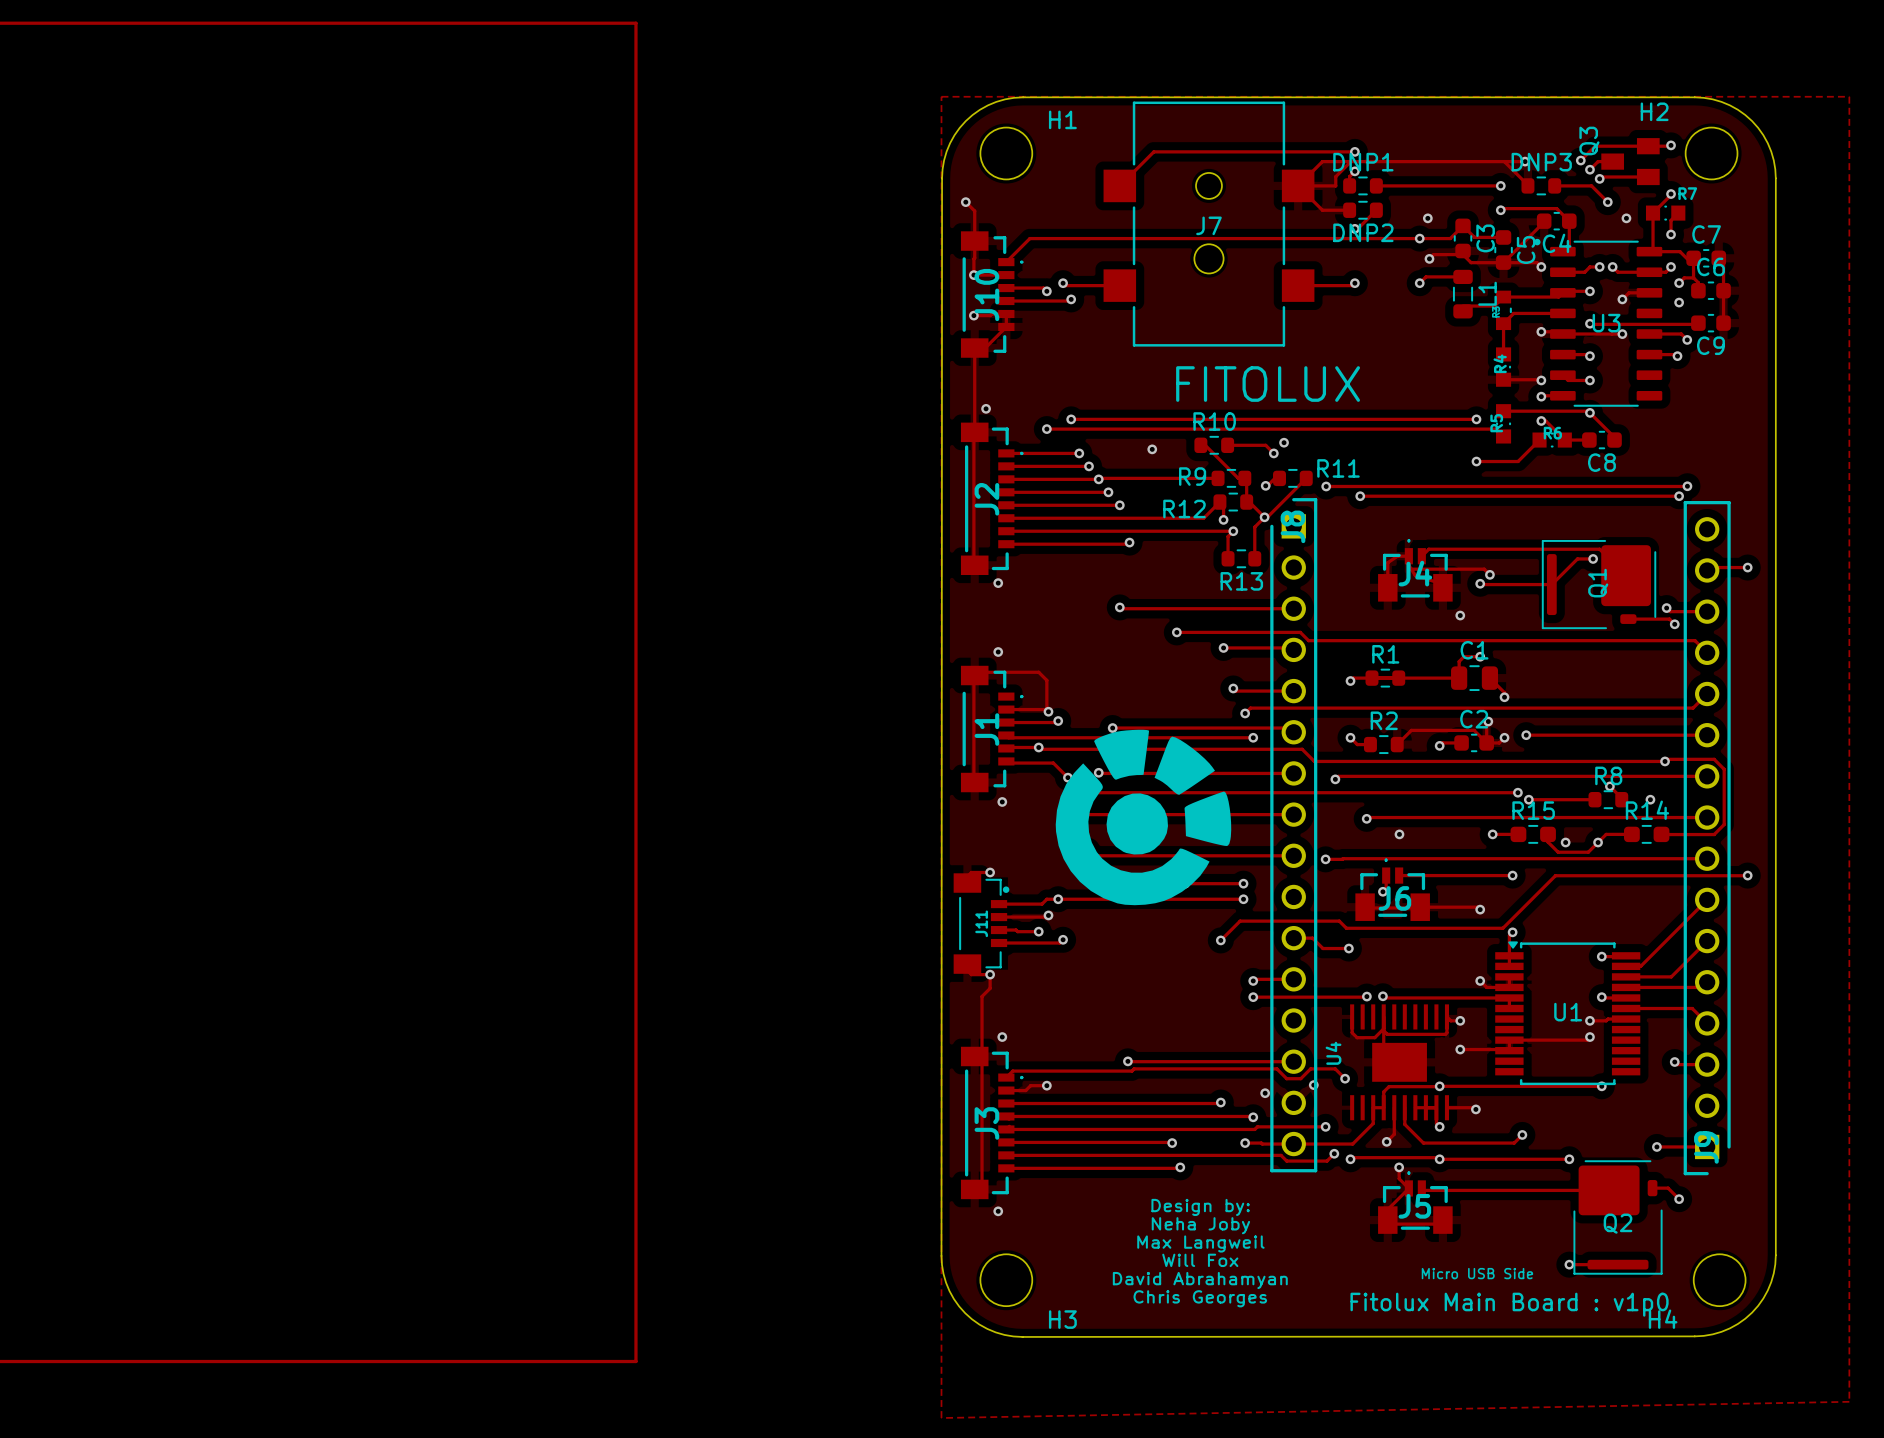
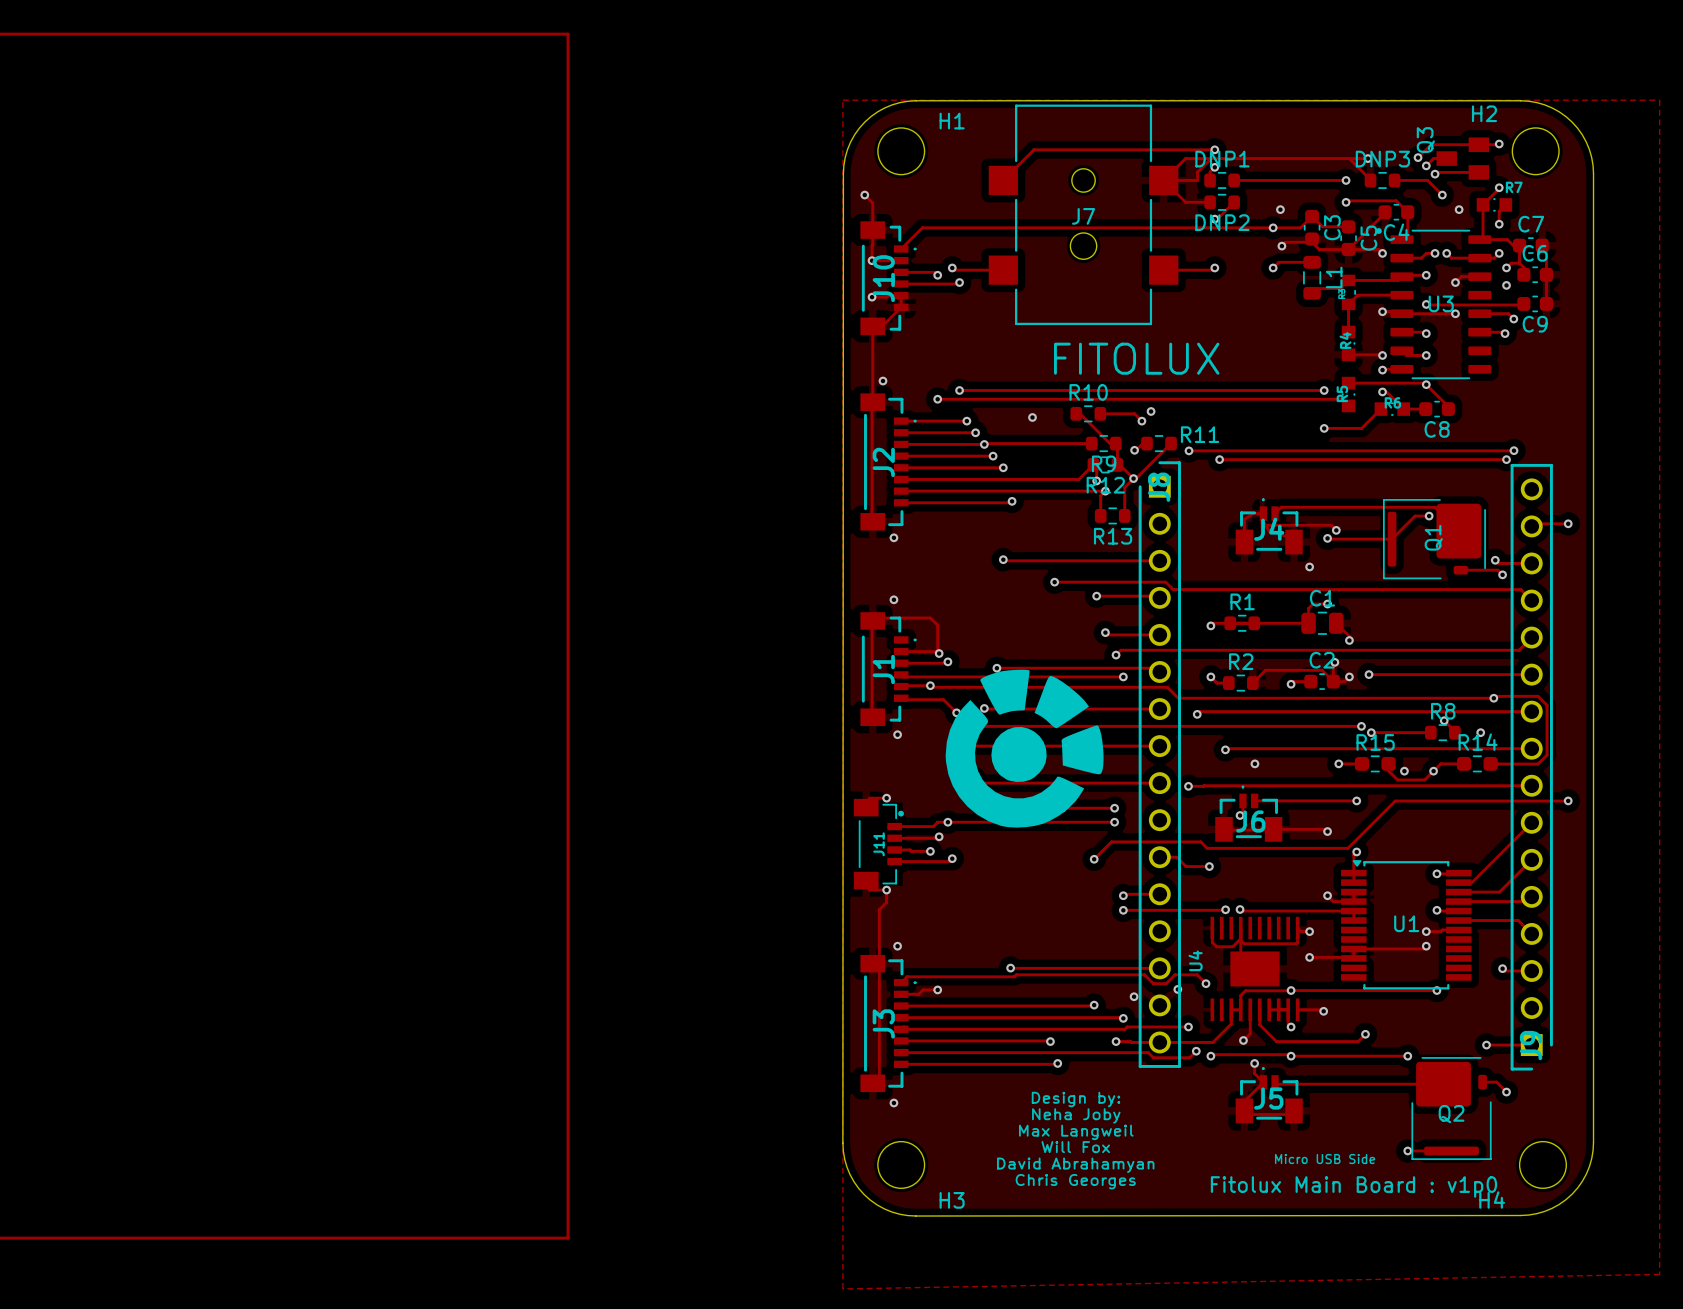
R9 name position: R9 (1192, 476) -> R9 (1104, 463)
R12 name position: R12 (1184, 508) -> R12 (1105, 485)

